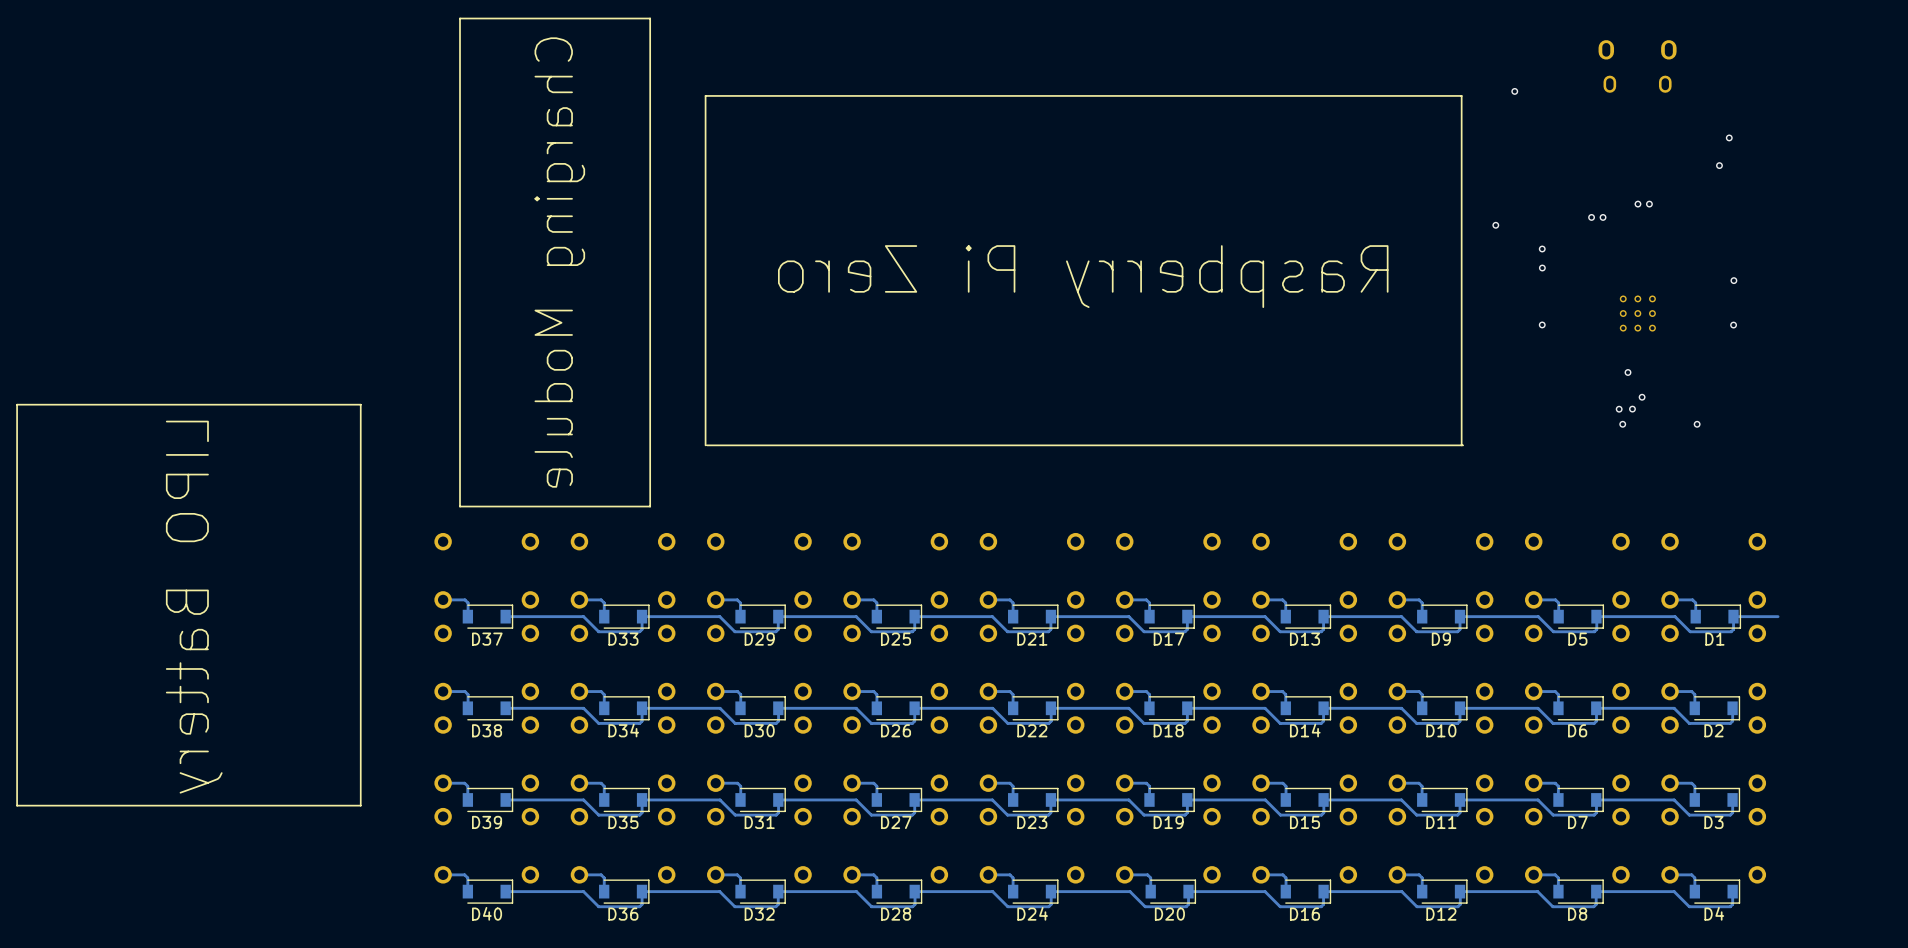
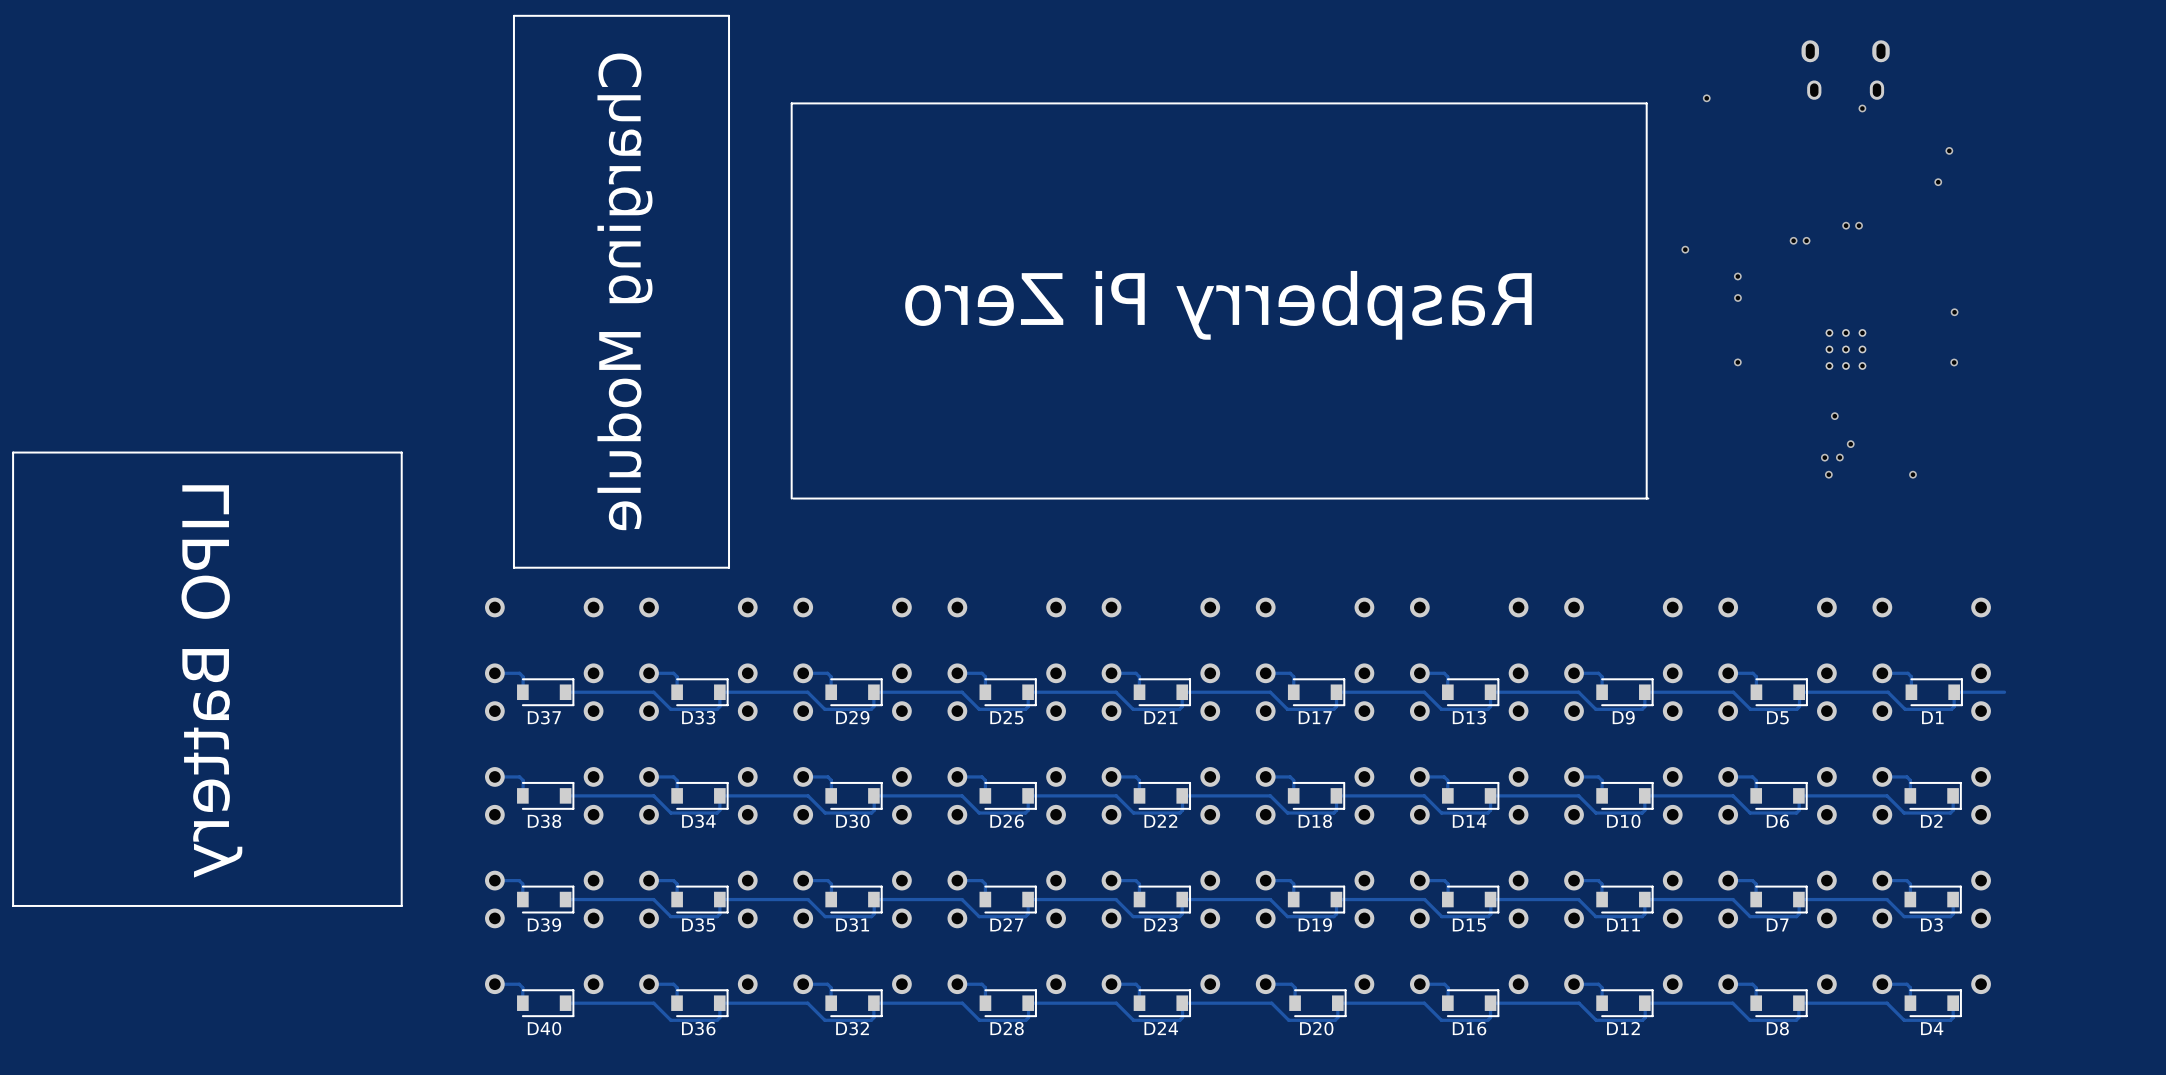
via: none -> (1862, 108)

